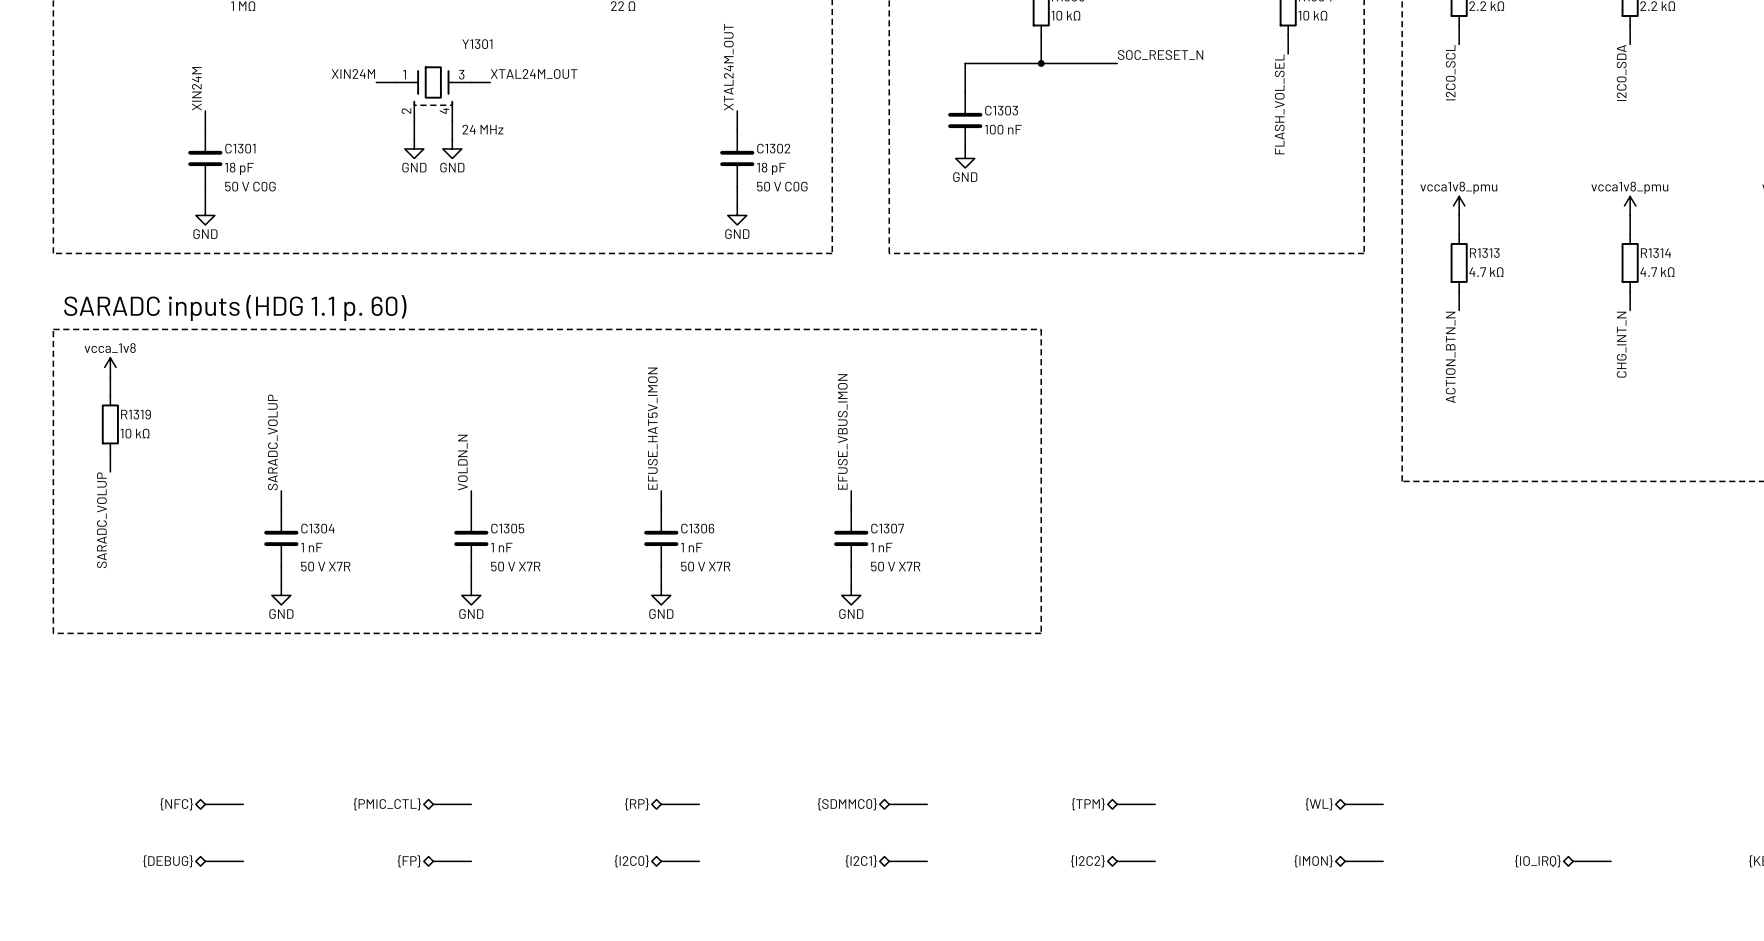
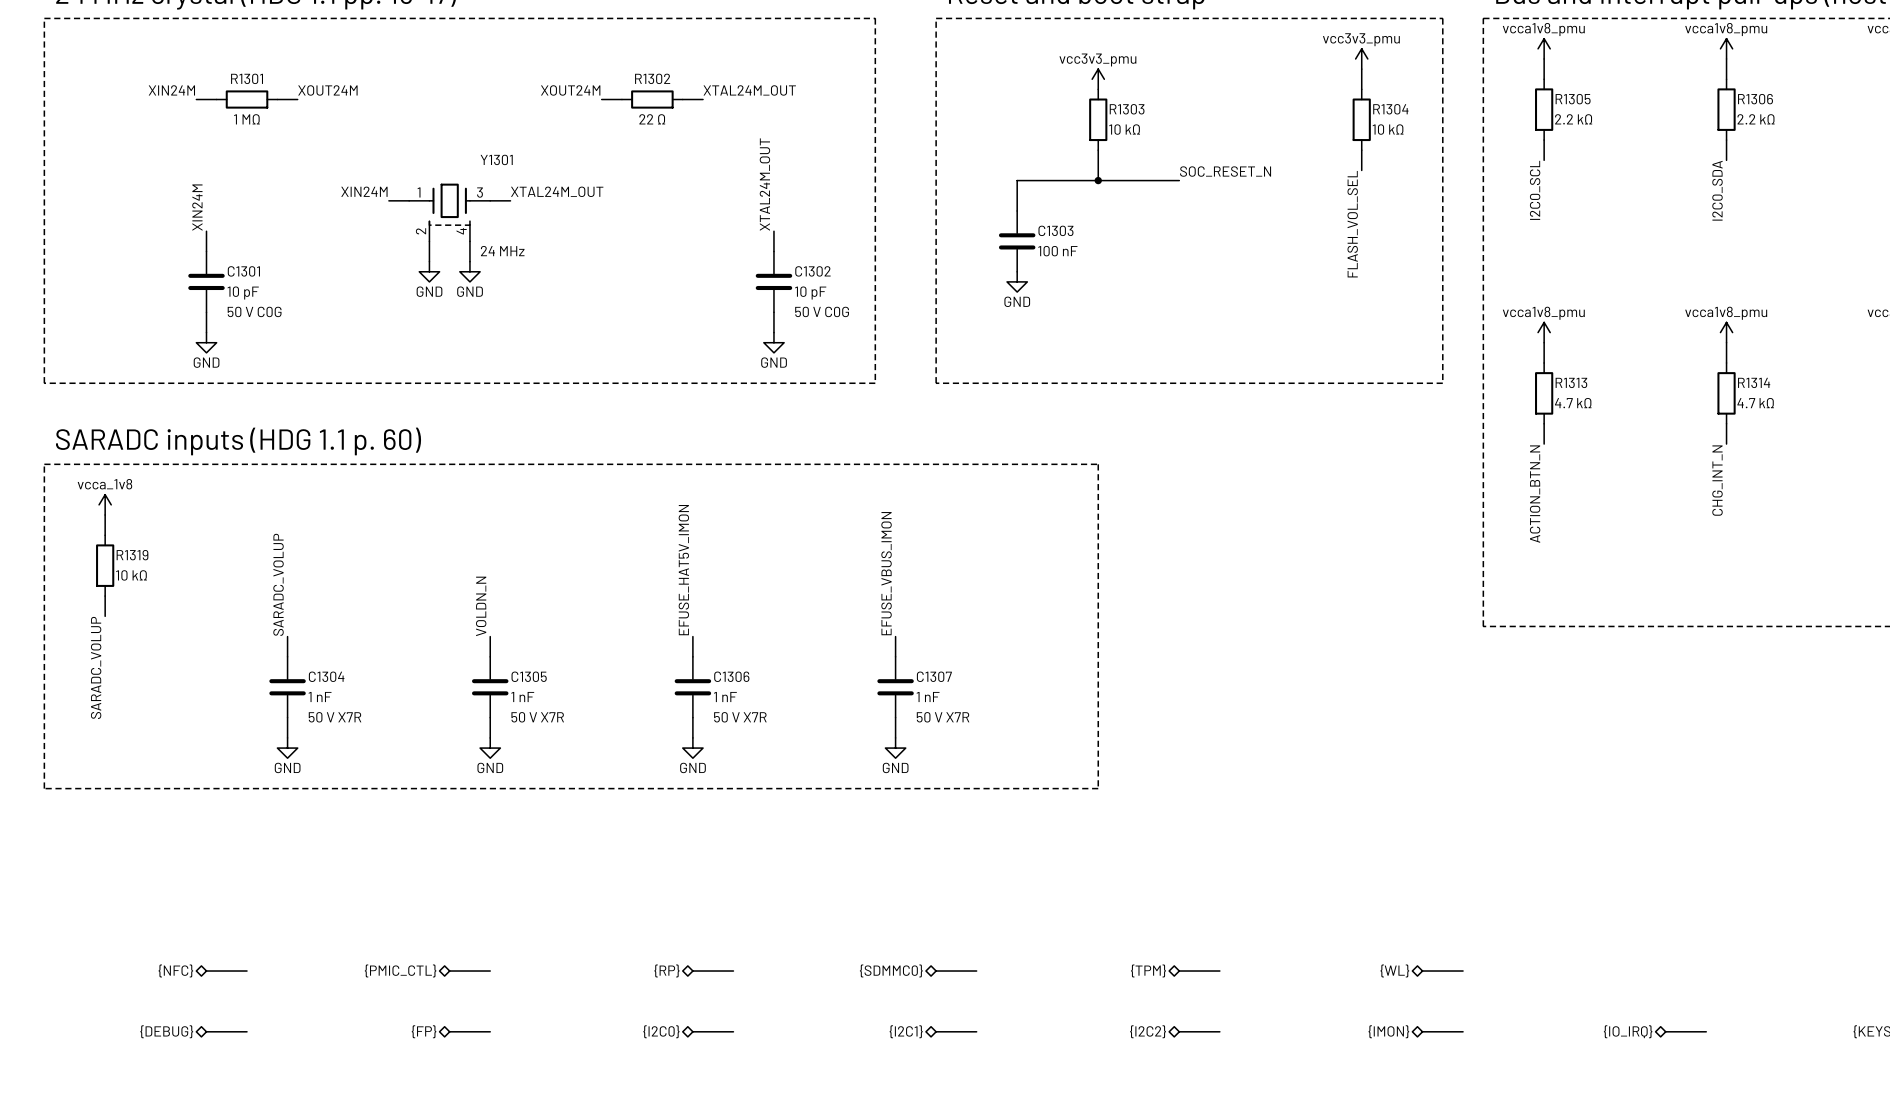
C1301 value: 18 pF (239, 168) -> 10 pF (243, 293)
C1302 value: 18 pF (771, 168) -> 10 pF (810, 293)

